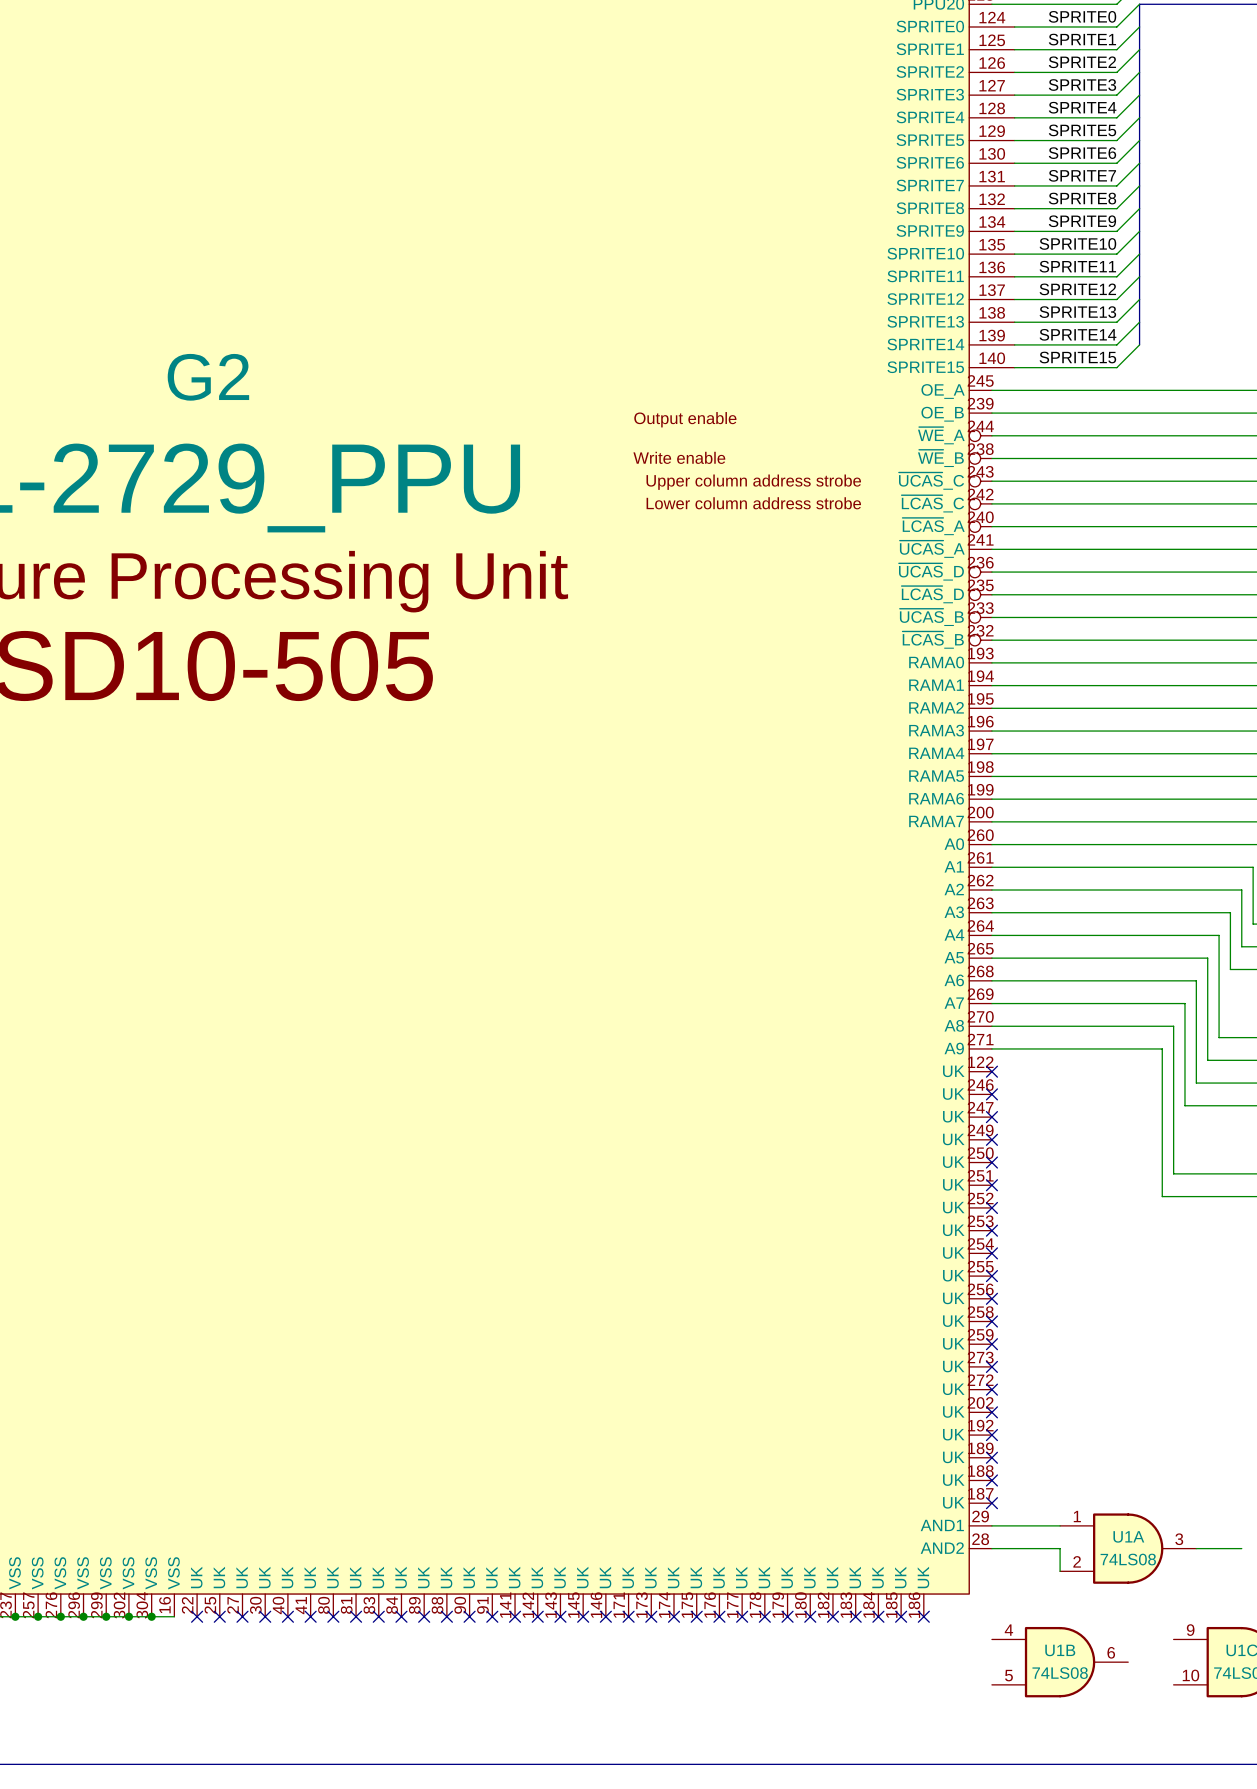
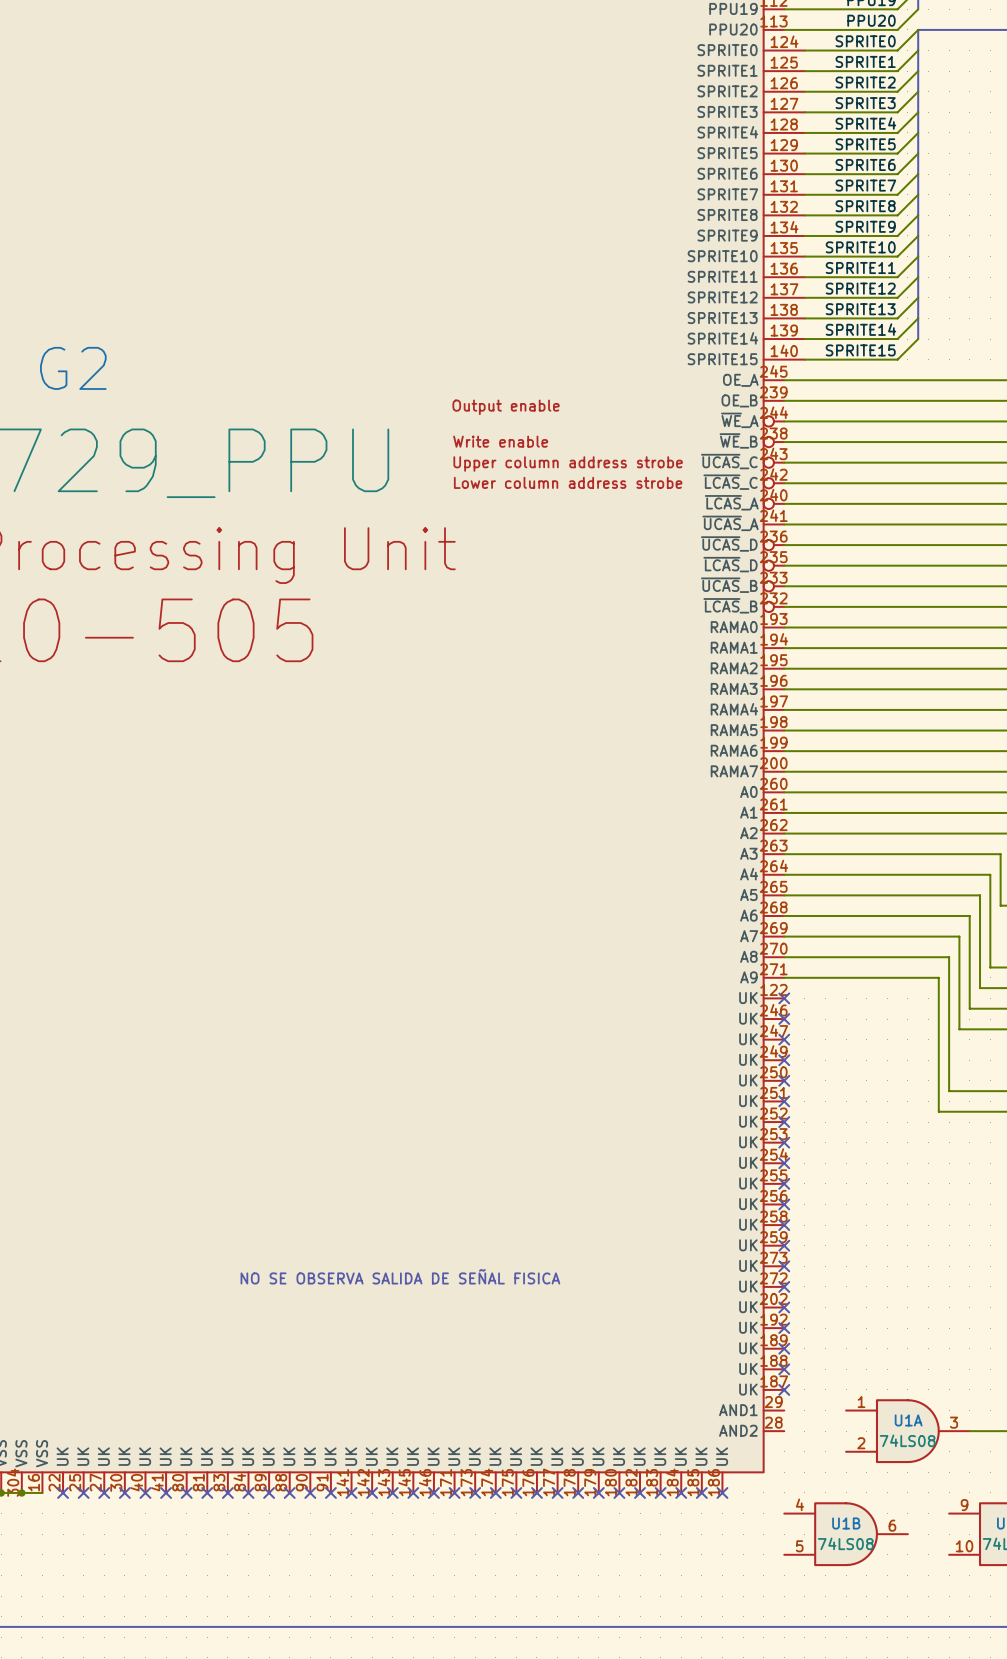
text: none -> NO SE OBSERVA SALIDA DE SEÑAL FISICA (400, 1276)
wire: (991, 1525) (1060, 1525) -> none
wire: (991, 1548) (1060, 1548) (1060, 1571) -> none

